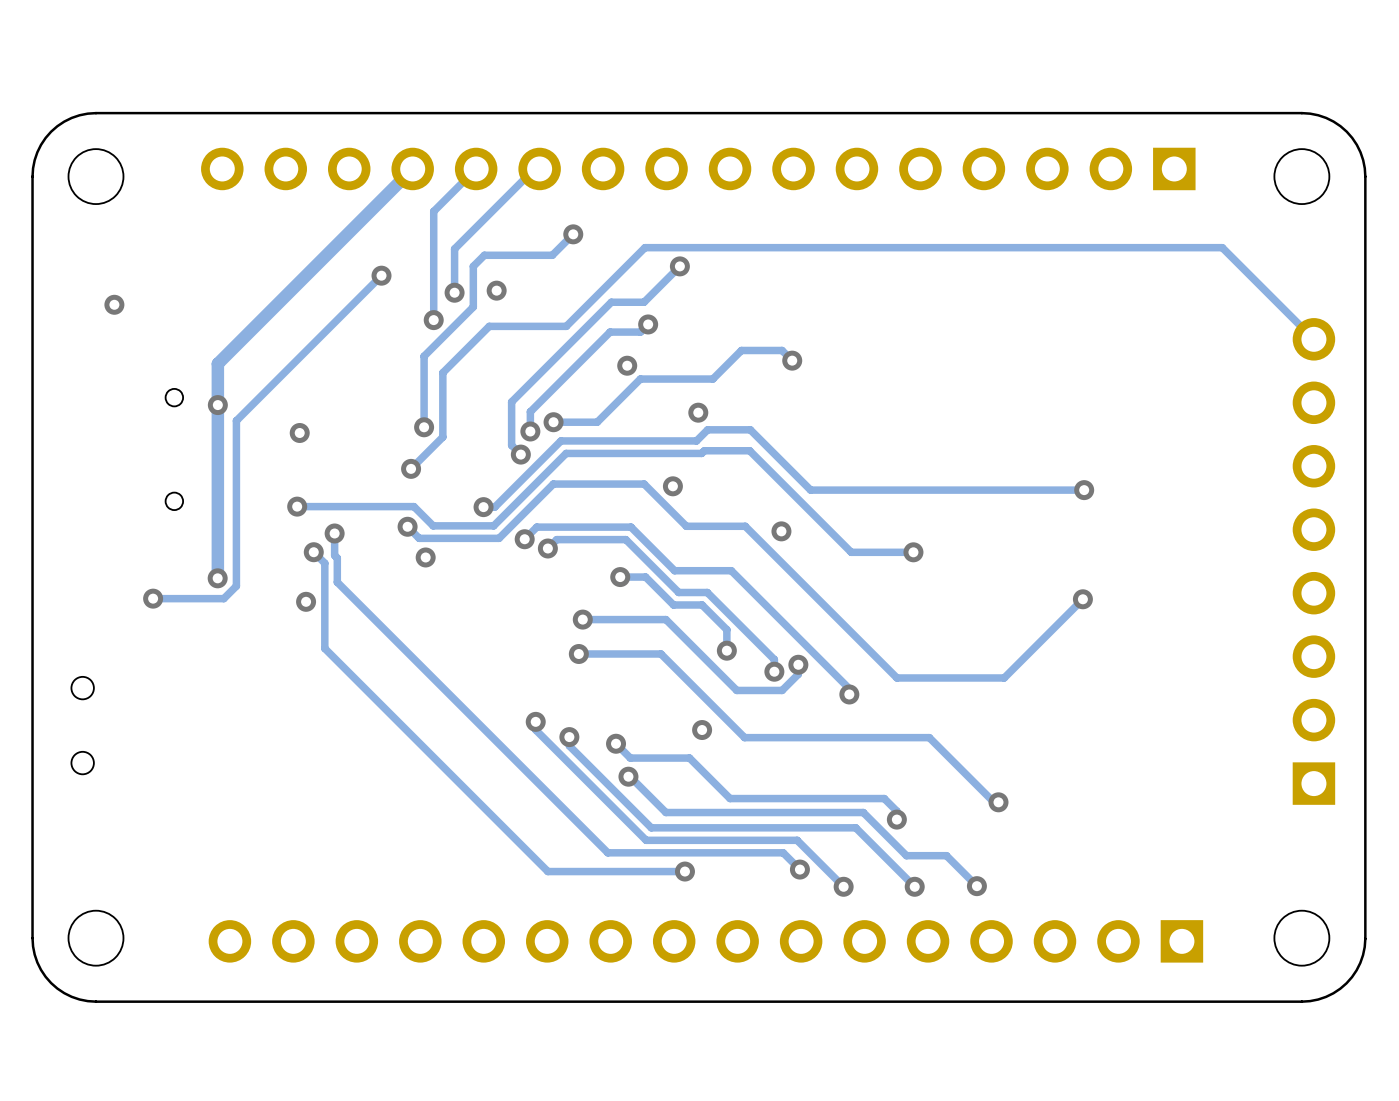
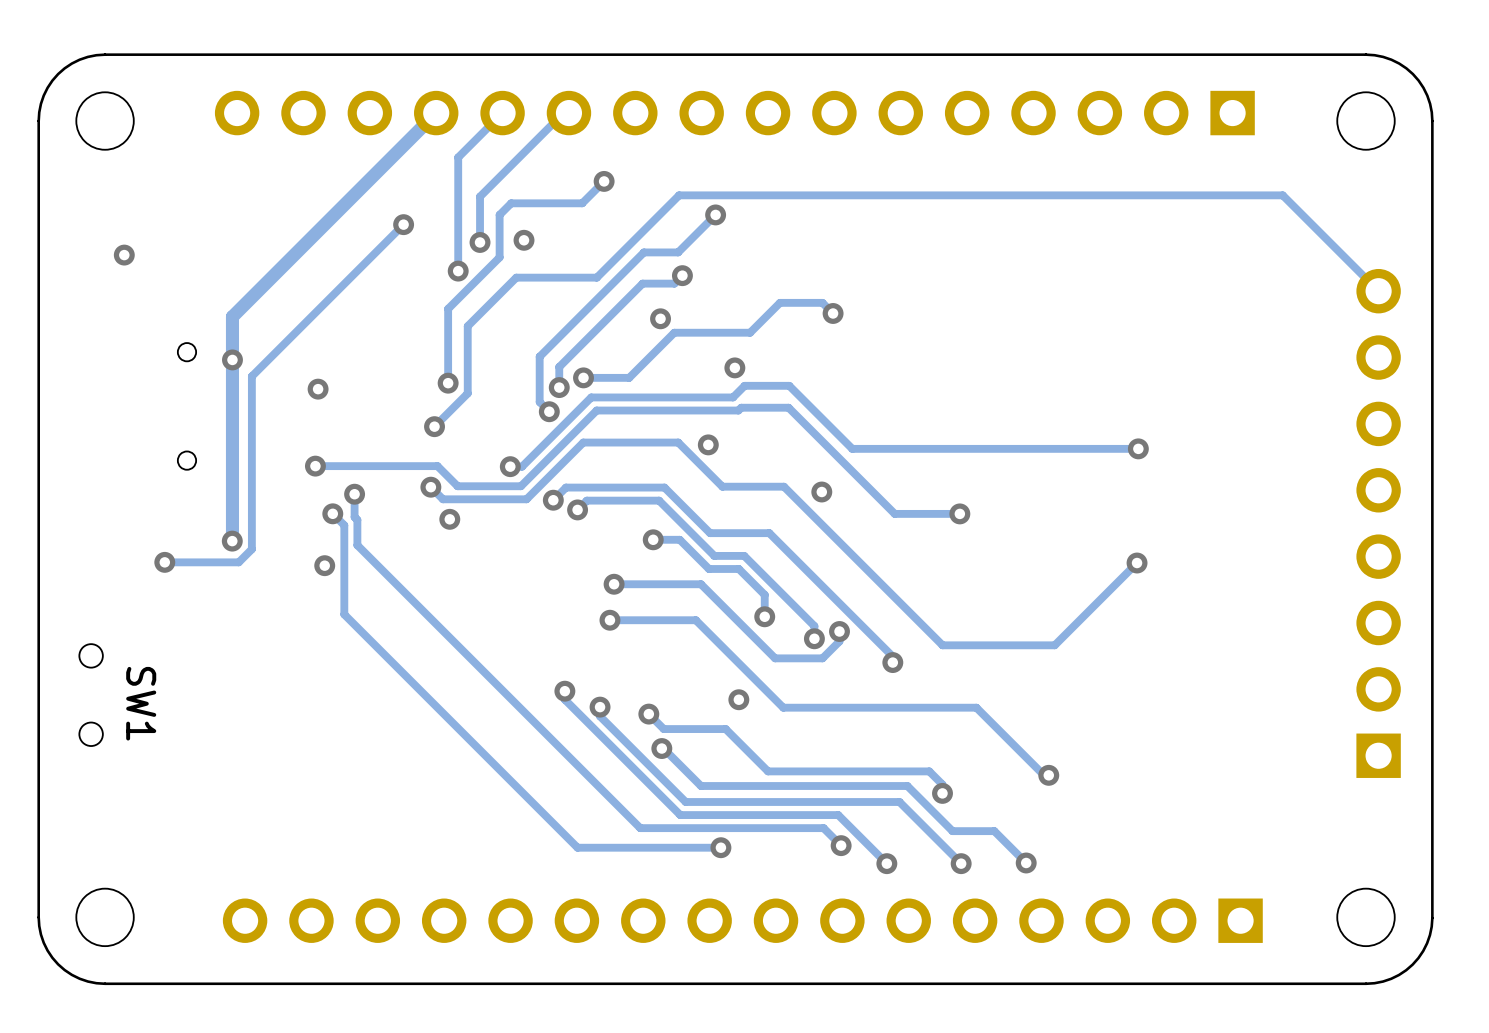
SW1 name: none -> SW1 (141, 703)

